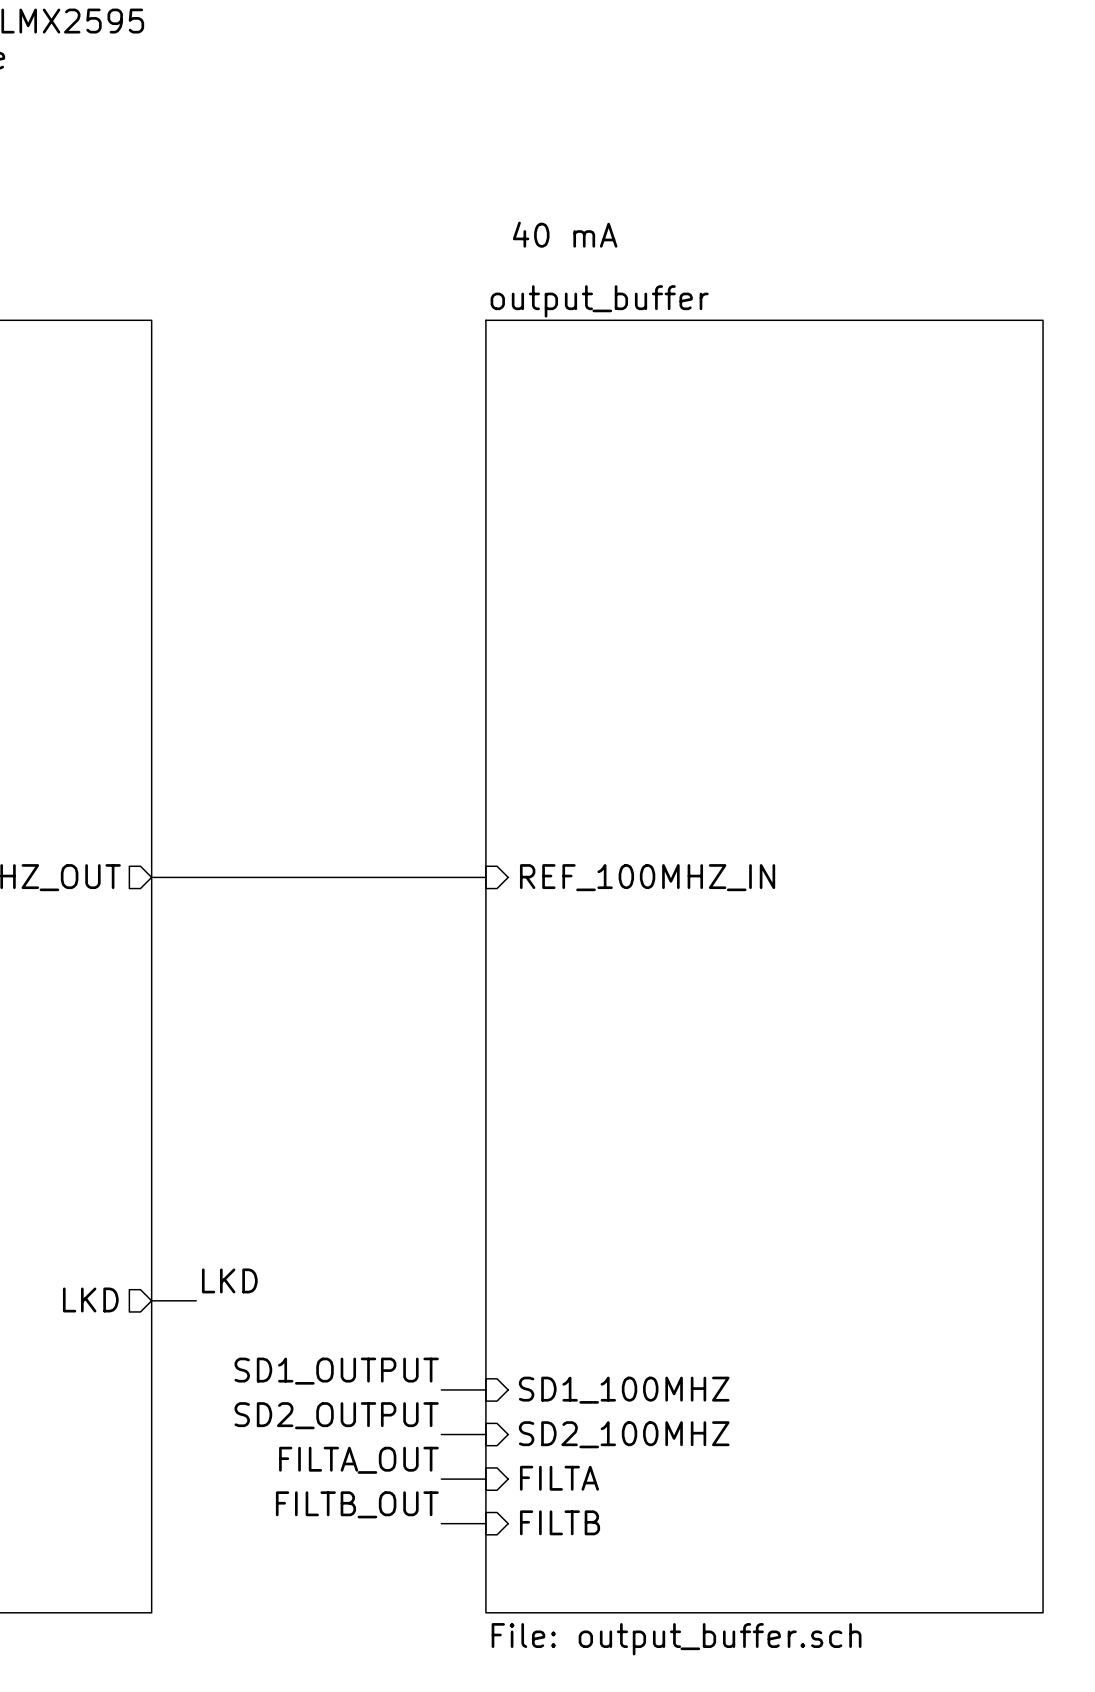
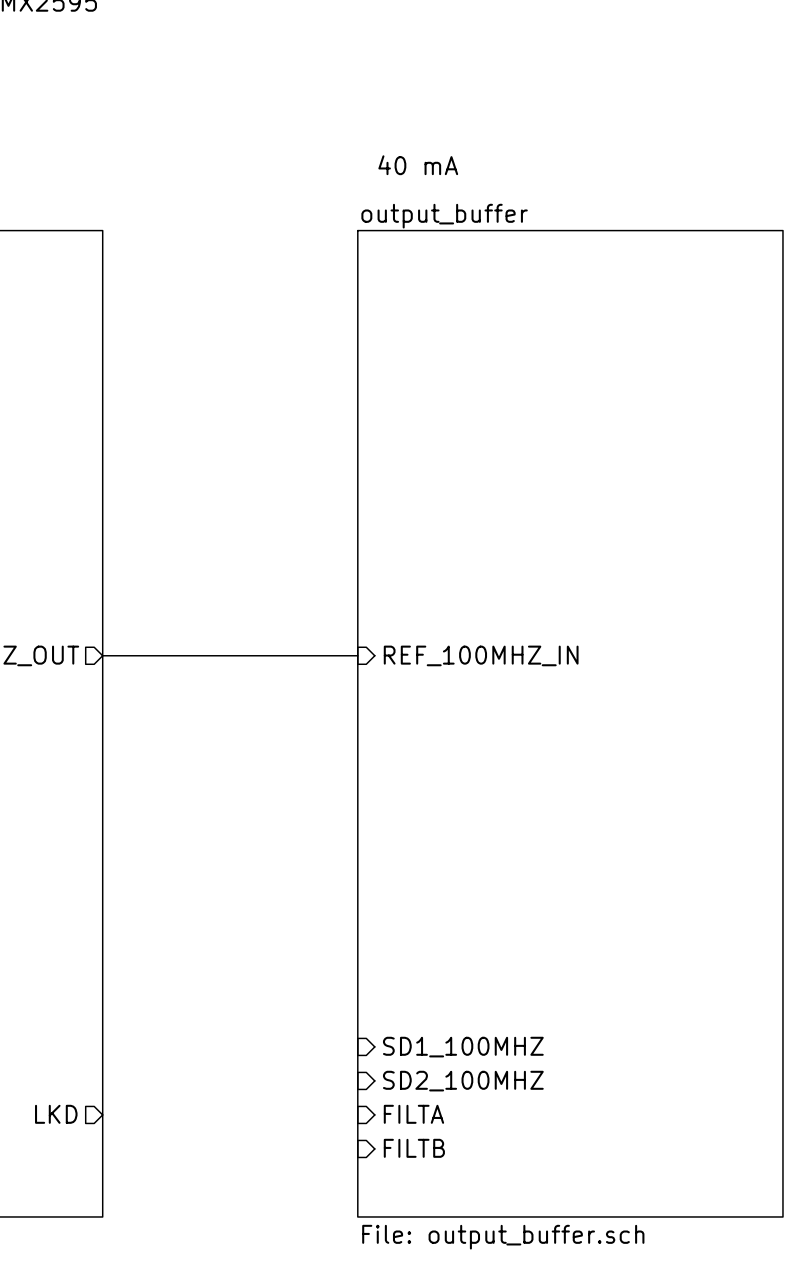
label: LKD (229, 1280) -> none
sheet pin position: LKD (90, 1299) -> LKD (56, 1114)
wire: (151, 1300) (196, 1300) -> none
label: SD1_OUTPUT (336, 1371) -> none
wire: (441, 1389) (485, 1389) -> none
label: SD2_OUTPUT (336, 1415) -> none
wire: (441, 1434) (485, 1434) -> none
label: FILTA_OUT (358, 1460) -> none
wire: (441, 1479) (485, 1479) -> none
label: FILTB_OUT (357, 1504) -> none
wire: (441, 1523) (485, 1523) -> none

